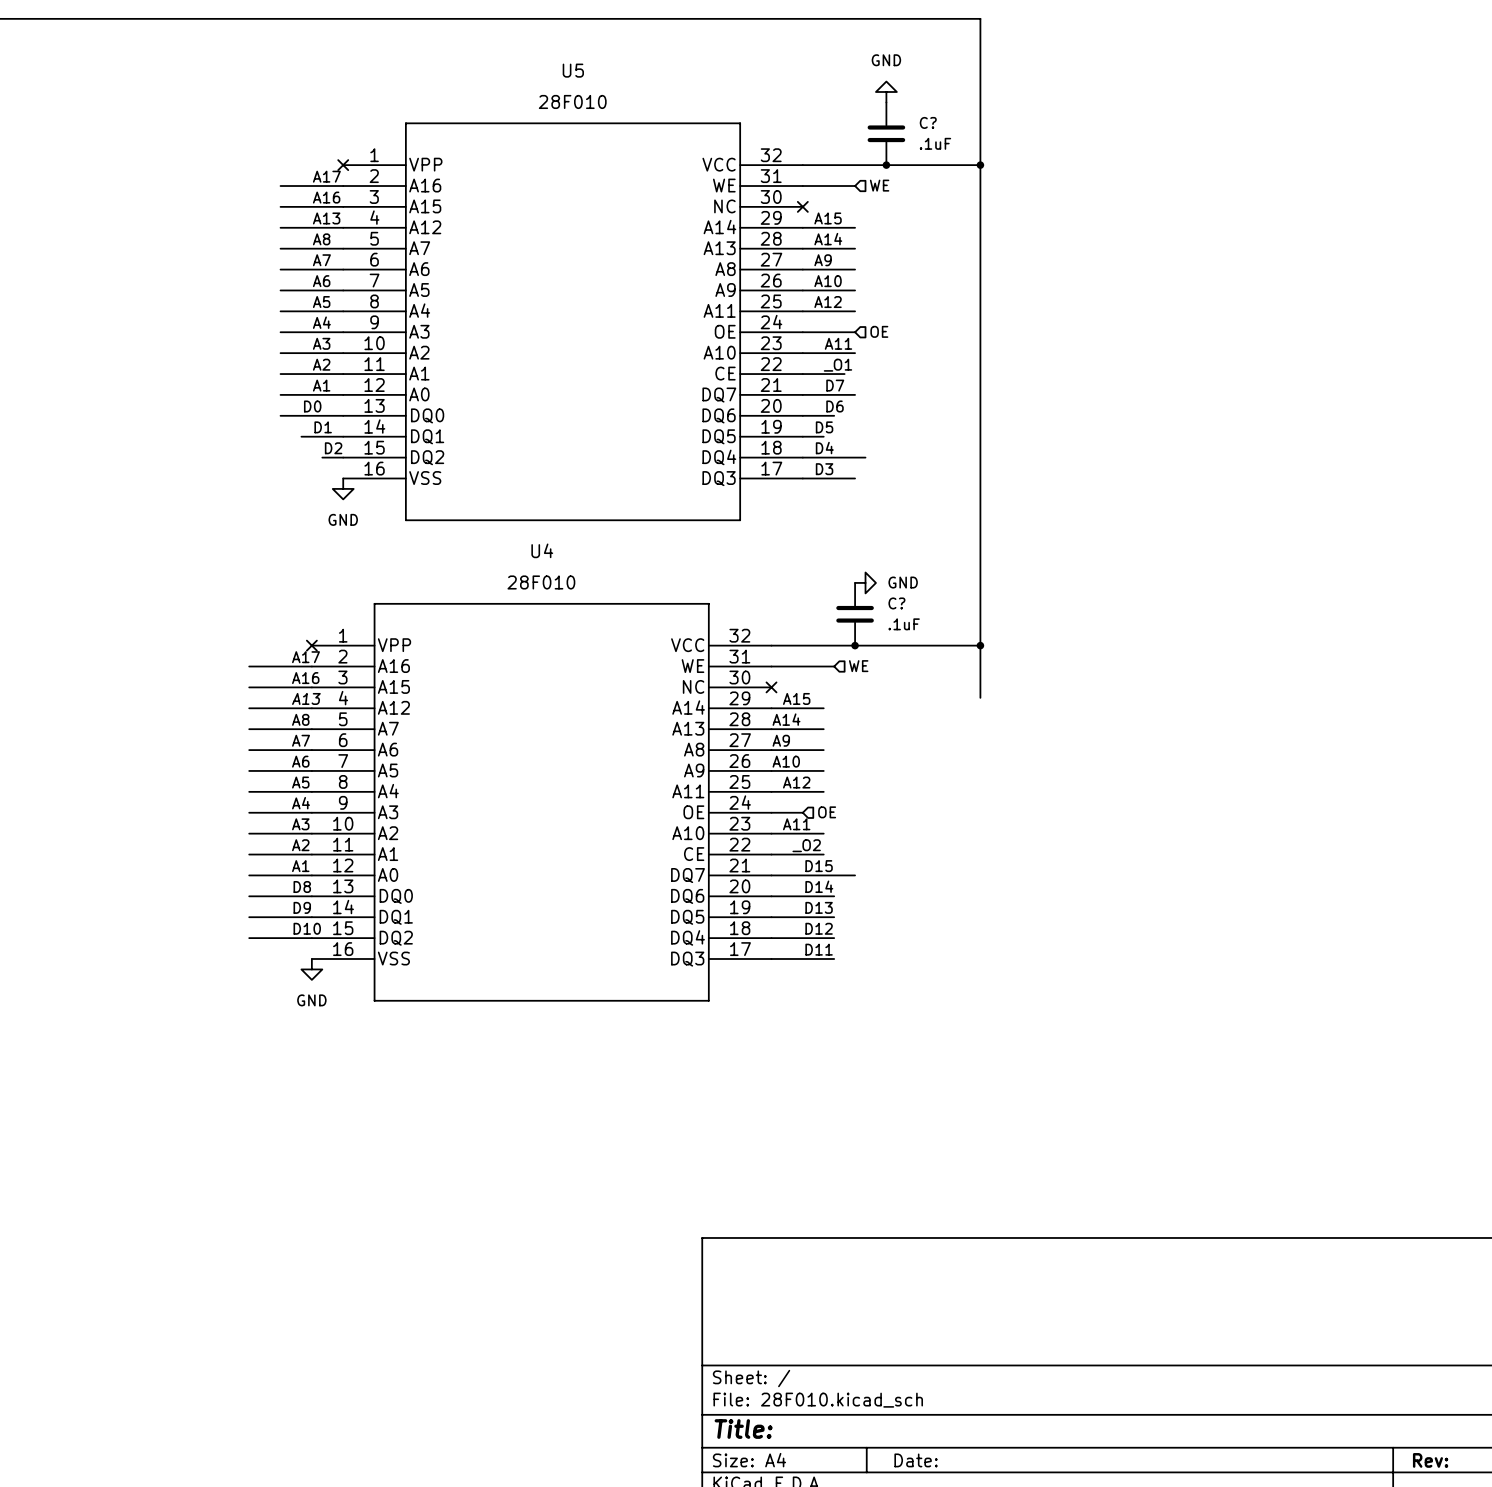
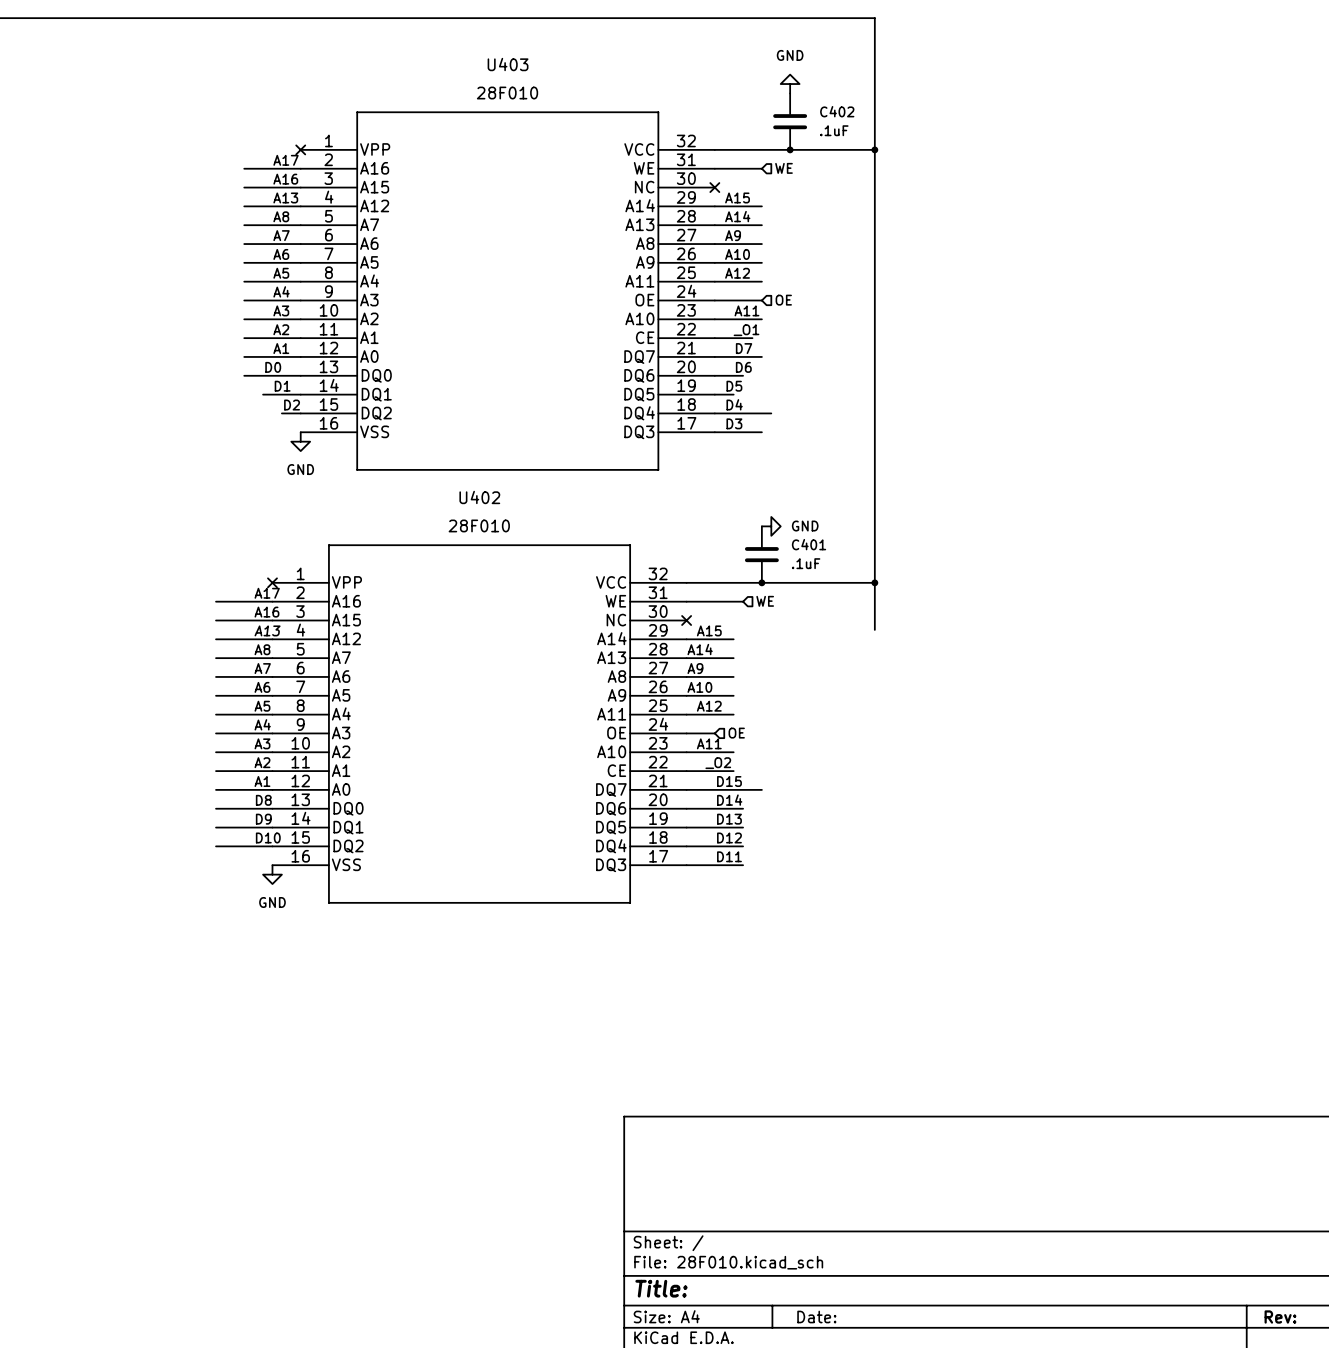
U5 name: U5 (573, 70) -> U403 (508, 64)
C? name: C? (928, 122) -> C402 (837, 111)
U4 name: U4 (542, 550) -> U402 (479, 497)
C? name: C? (896, 603) -> C401 (809, 544)

